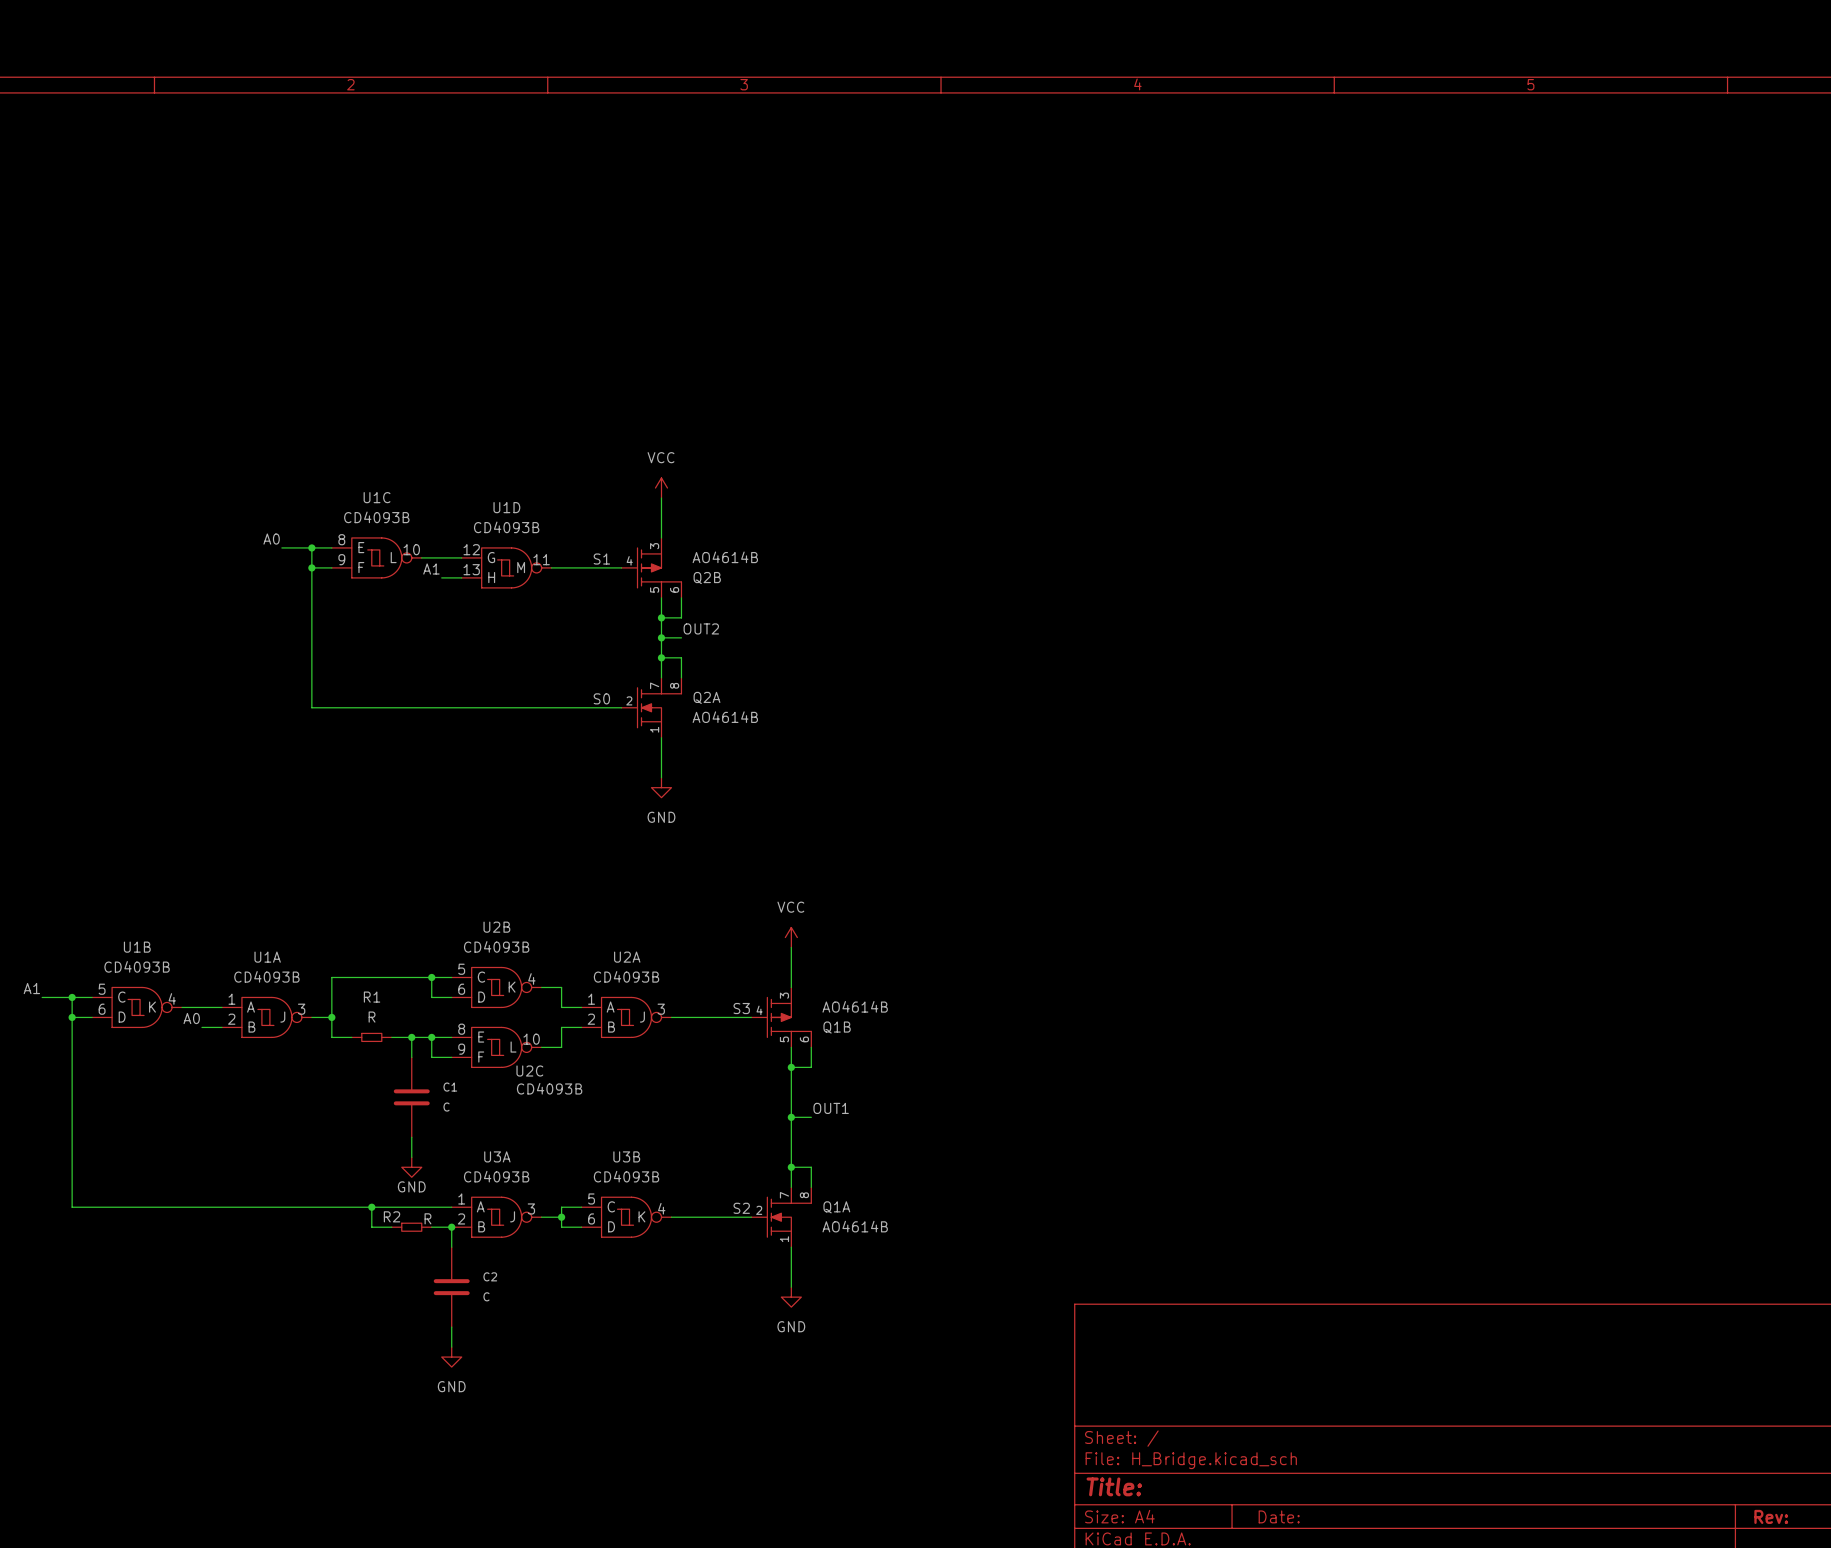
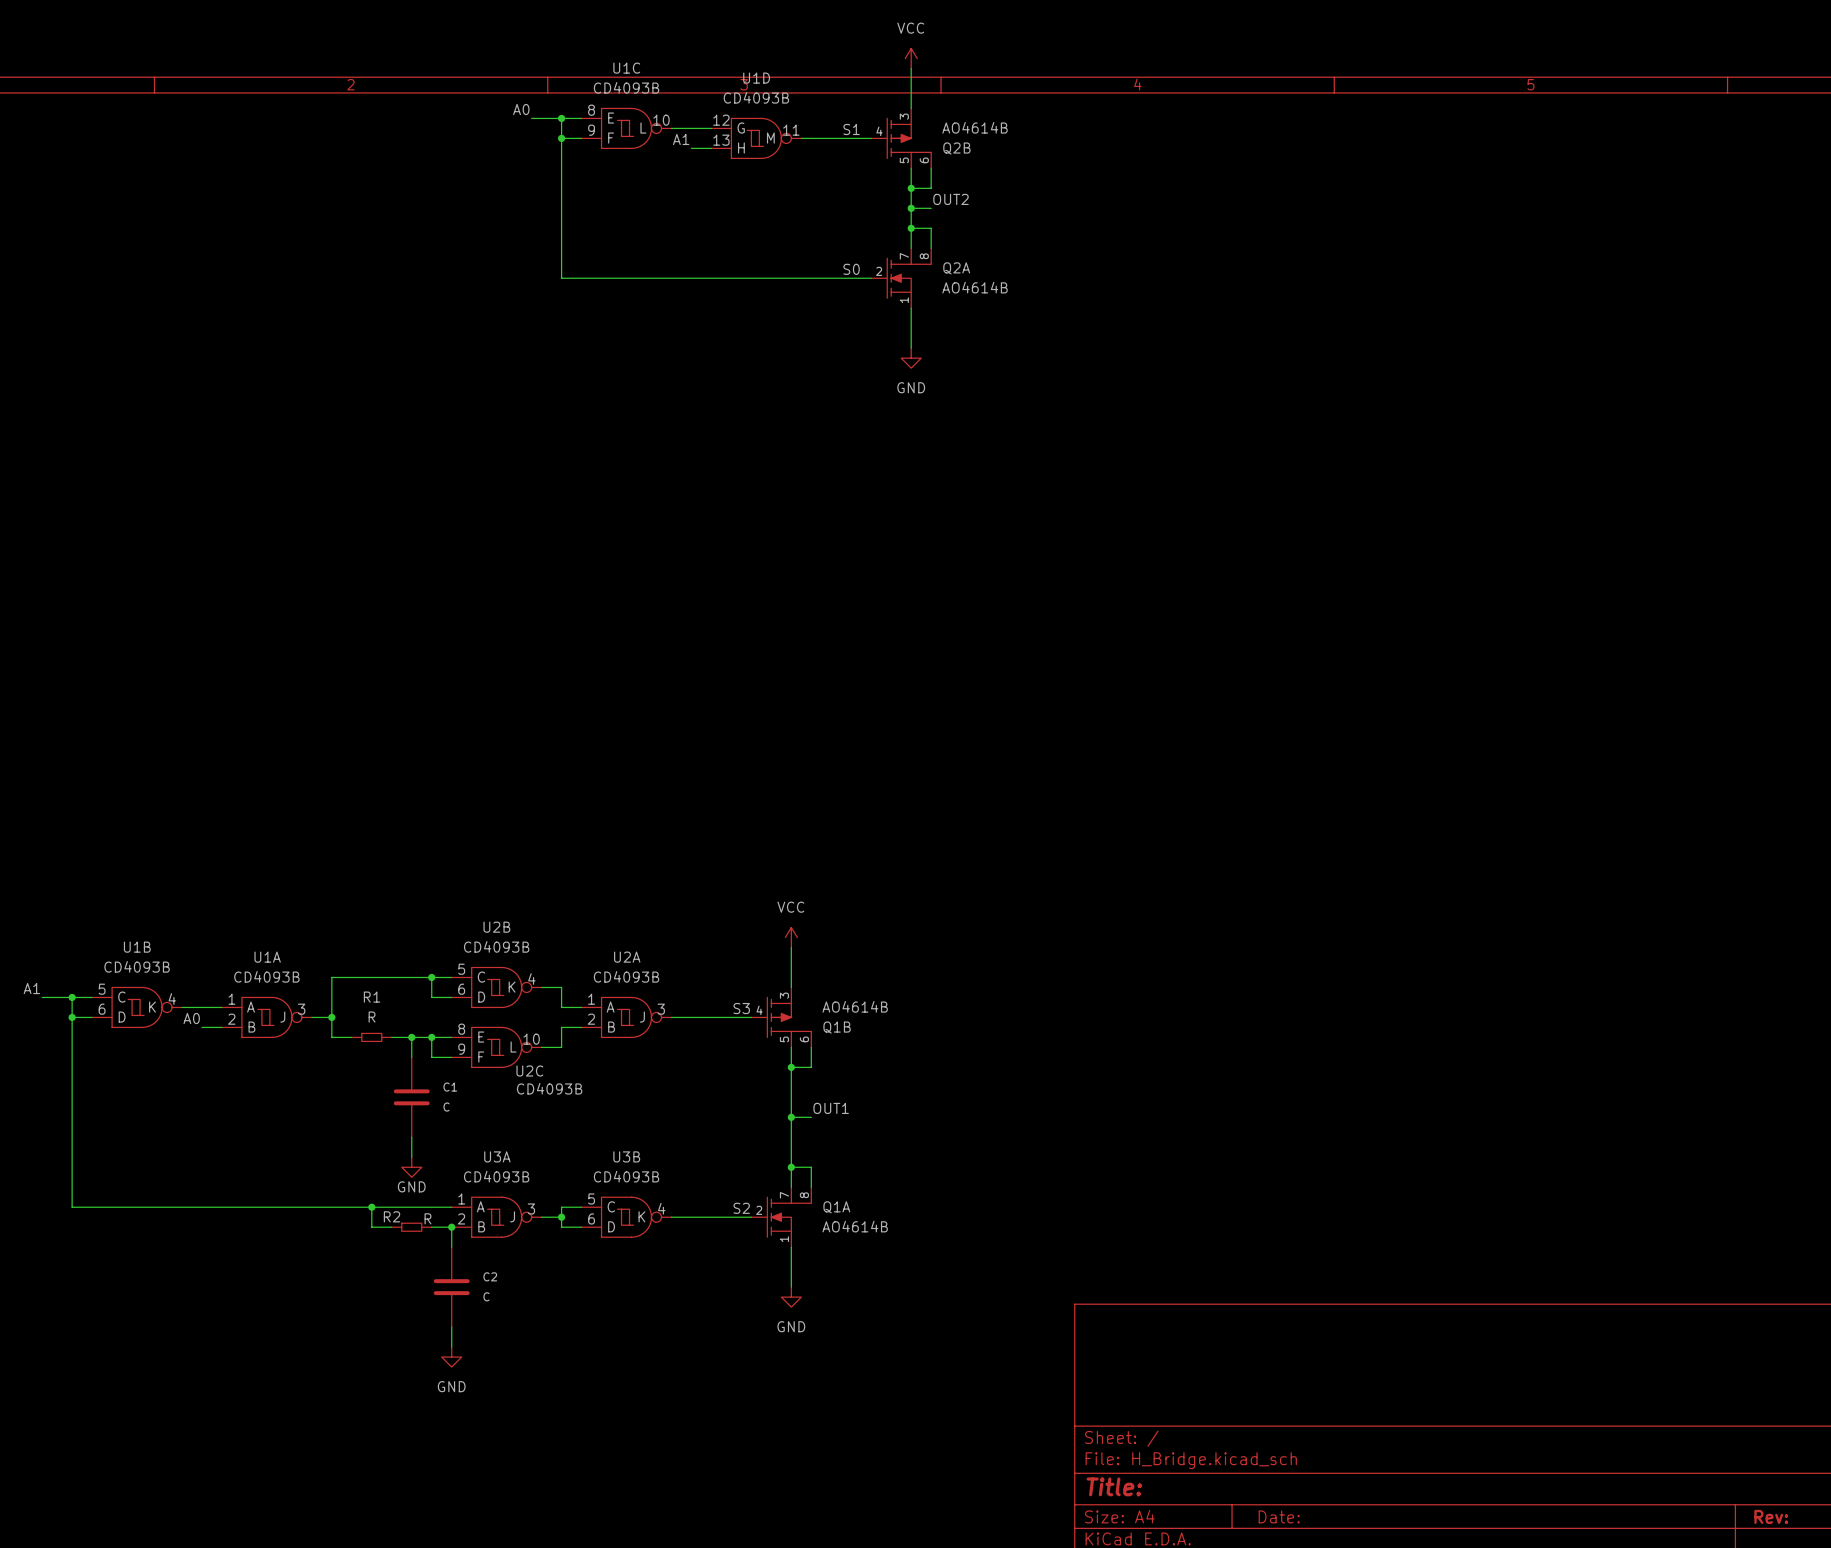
power symbol: none -> VCC (911, 58)
wire: none -> (911, 68) (911, 108)
label: none -> A0 (521, 109)
wire: none -> (531, 118) (581, 118)
wire: none -> (561, 118) (561, 278) (871, 278)
junction: none -> (561, 118)
wire: none -> (671, 128) (711, 128)
label: none -> S1 (851, 129)
wire: none -> (561, 138) (581, 138)
junction: none -> (561, 138)
wire: none -> (801, 138) (871, 138)
label: none -> A1 (681, 139)
wire: none -> (691, 148) (711, 148)
wire: none -> (911, 168) (911, 248)
wire: none -> (931, 168) (931, 188) (911, 188)
junction: none -> (911, 188)
label: none -> OUT2 (951, 199)
wire: none -> (911, 208) (931, 208)
junction: none -> (911, 208)
wire: none -> (911, 228) (931, 228) (931, 248)
junction: none -> (911, 228)
label: none -> S0 (851, 269)
wire: none -> (911, 308) (911, 348)
power symbol: none -> GND (911, 358)
power symbol: VCC (661, 488) -> none
wire: (661, 498) (661, 537) -> none
label: A0 (271, 539) -> none
wire: (281, 547) (331, 547) -> none
wire: (311, 547) (311, 707) (621, 707) -> none
junction: (311, 547) -> none
U1C position: (376, 557) -> (626, 128)
wire: (421, 557) (461, 557) -> none
label: S1 (601, 559) -> none
wire: (311, 567) (331, 567) -> none
junction: (311, 567) -> none
U1D position: (506, 567) -> (756, 138)
wire: (551, 567) (621, 567) -> none
Q2B position: (651, 567) -> (901, 138)
label: A1 (431, 569) -> none
wire: (441, 577) (461, 577) -> none
wire: (661, 597) (661, 677) -> none
wire: (681, 597) (681, 617) (661, 617) -> none
junction: (661, 617) -> none
label: OUT2 (701, 628) -> none
wire: (661, 637) (681, 637) -> none
junction: (661, 637) -> none
wire: (661, 657) (681, 657) (681, 677) -> none
junction: (661, 657) -> none
label: S0 (601, 698) -> none
Q2A position: (651, 707) -> (901, 278)
wire: (661, 737) (661, 777) -> none
power symbol: GND (661, 787) -> none

